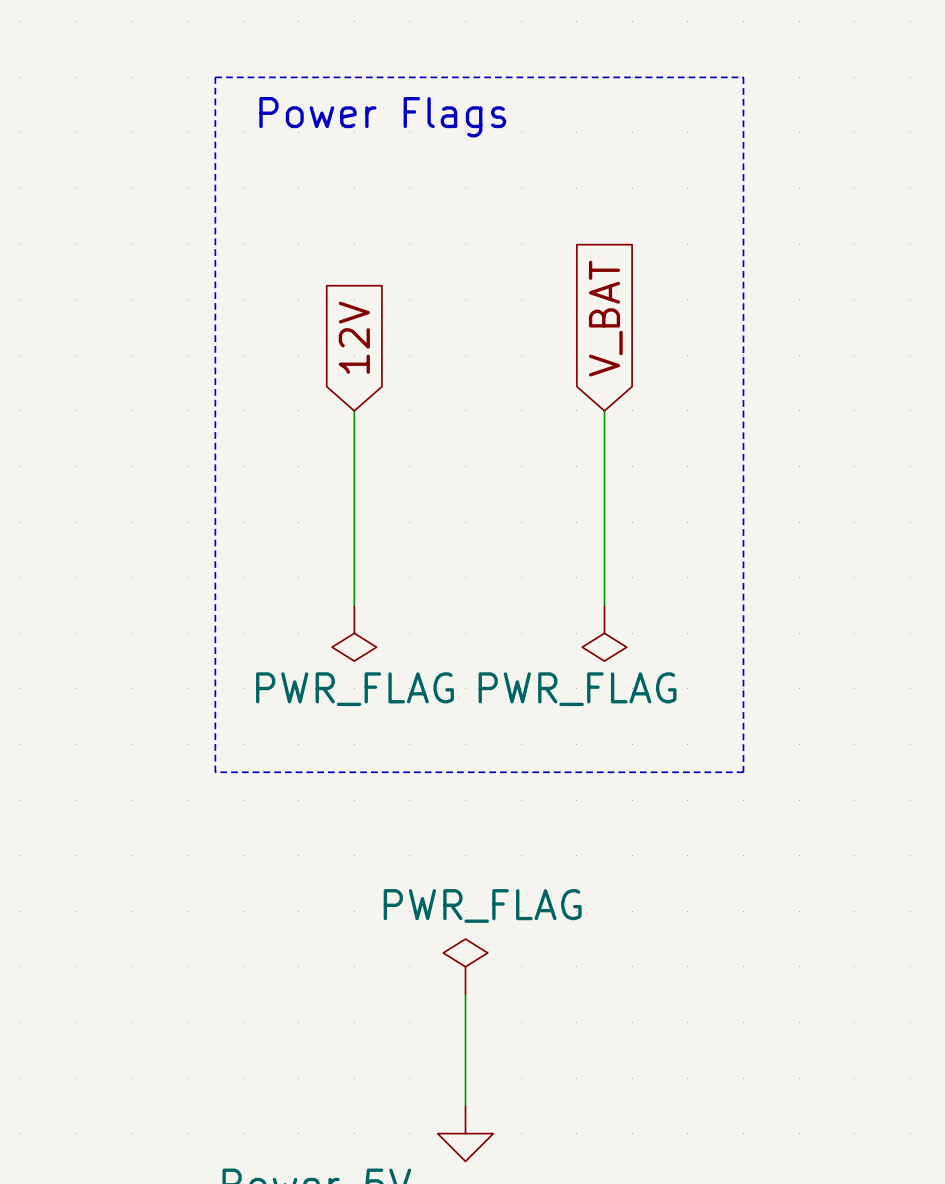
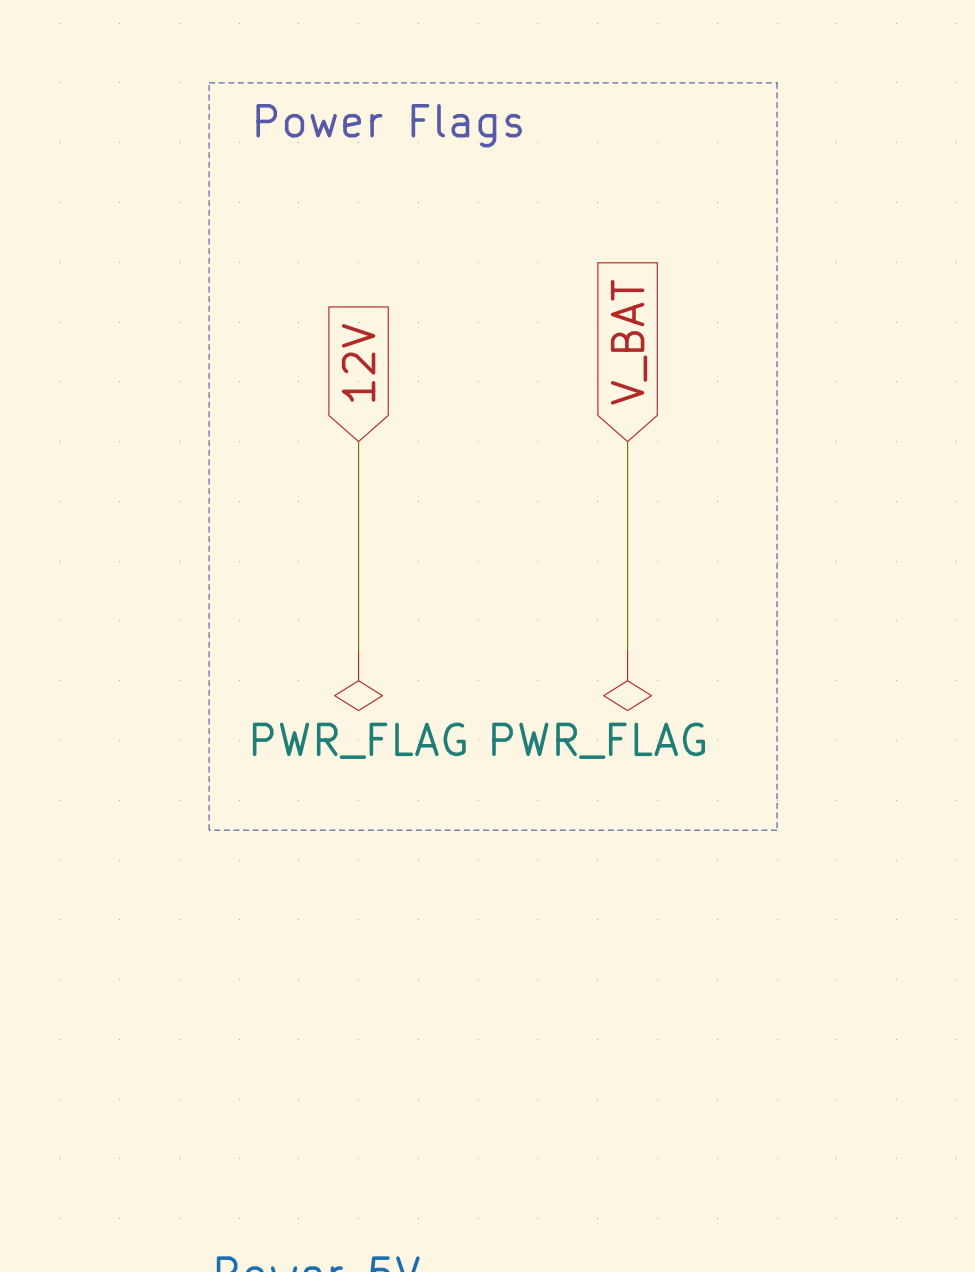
power symbol: PWR_FLAG (465, 966) -> none
wire: (465, 994) (465, 1105) -> none
power symbol: (465, 1133) -> none

